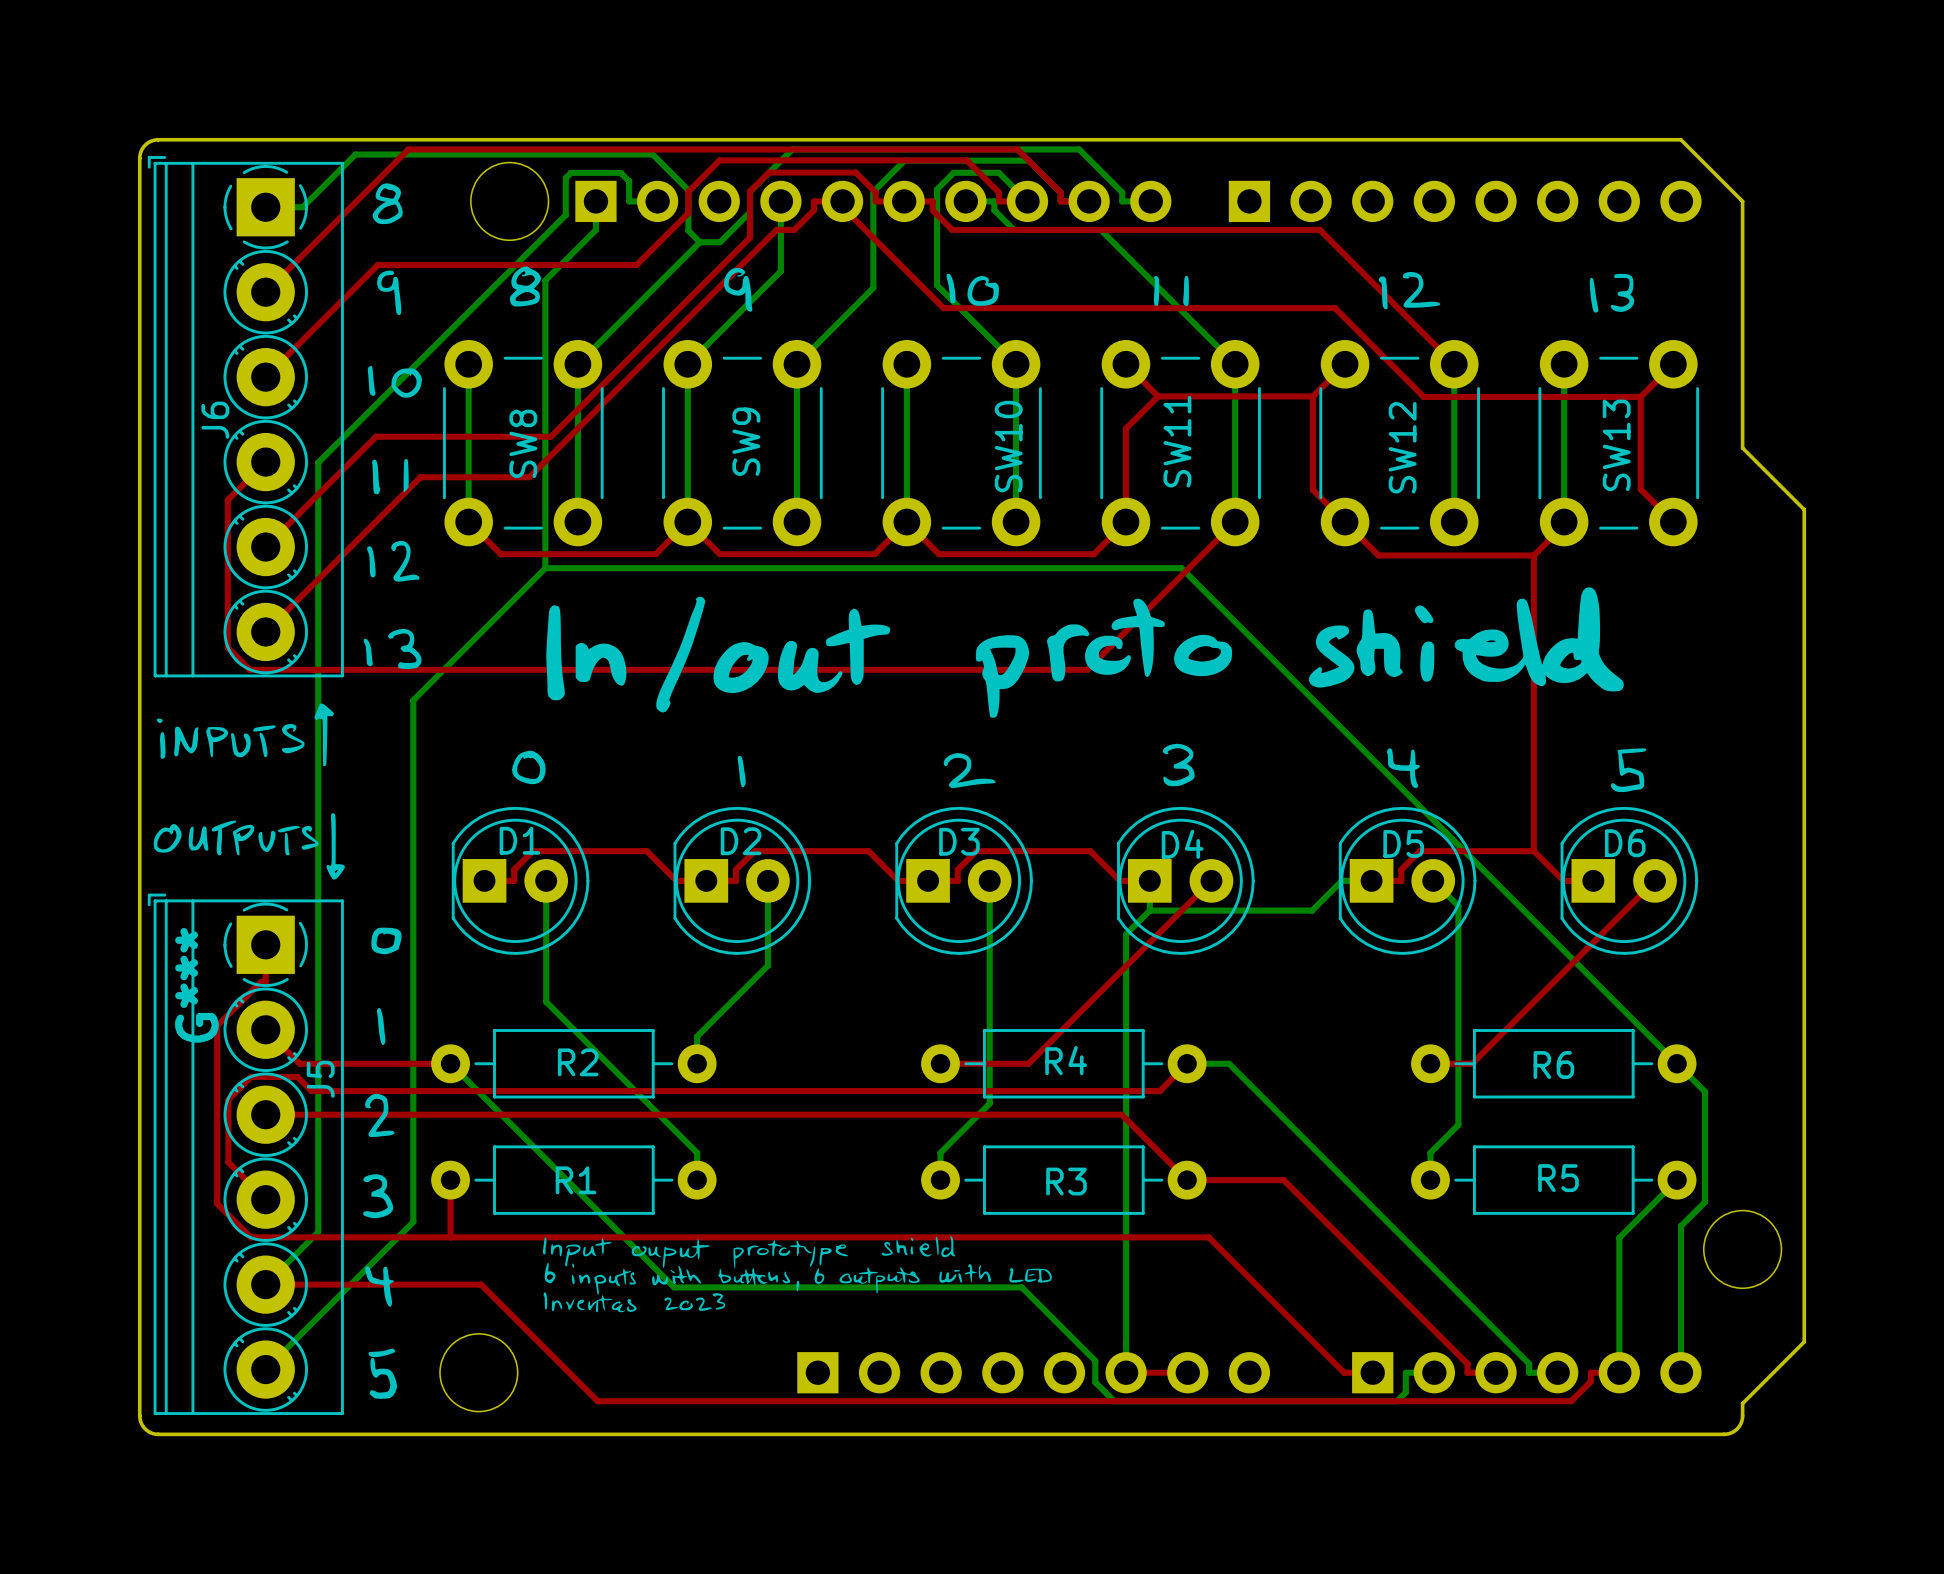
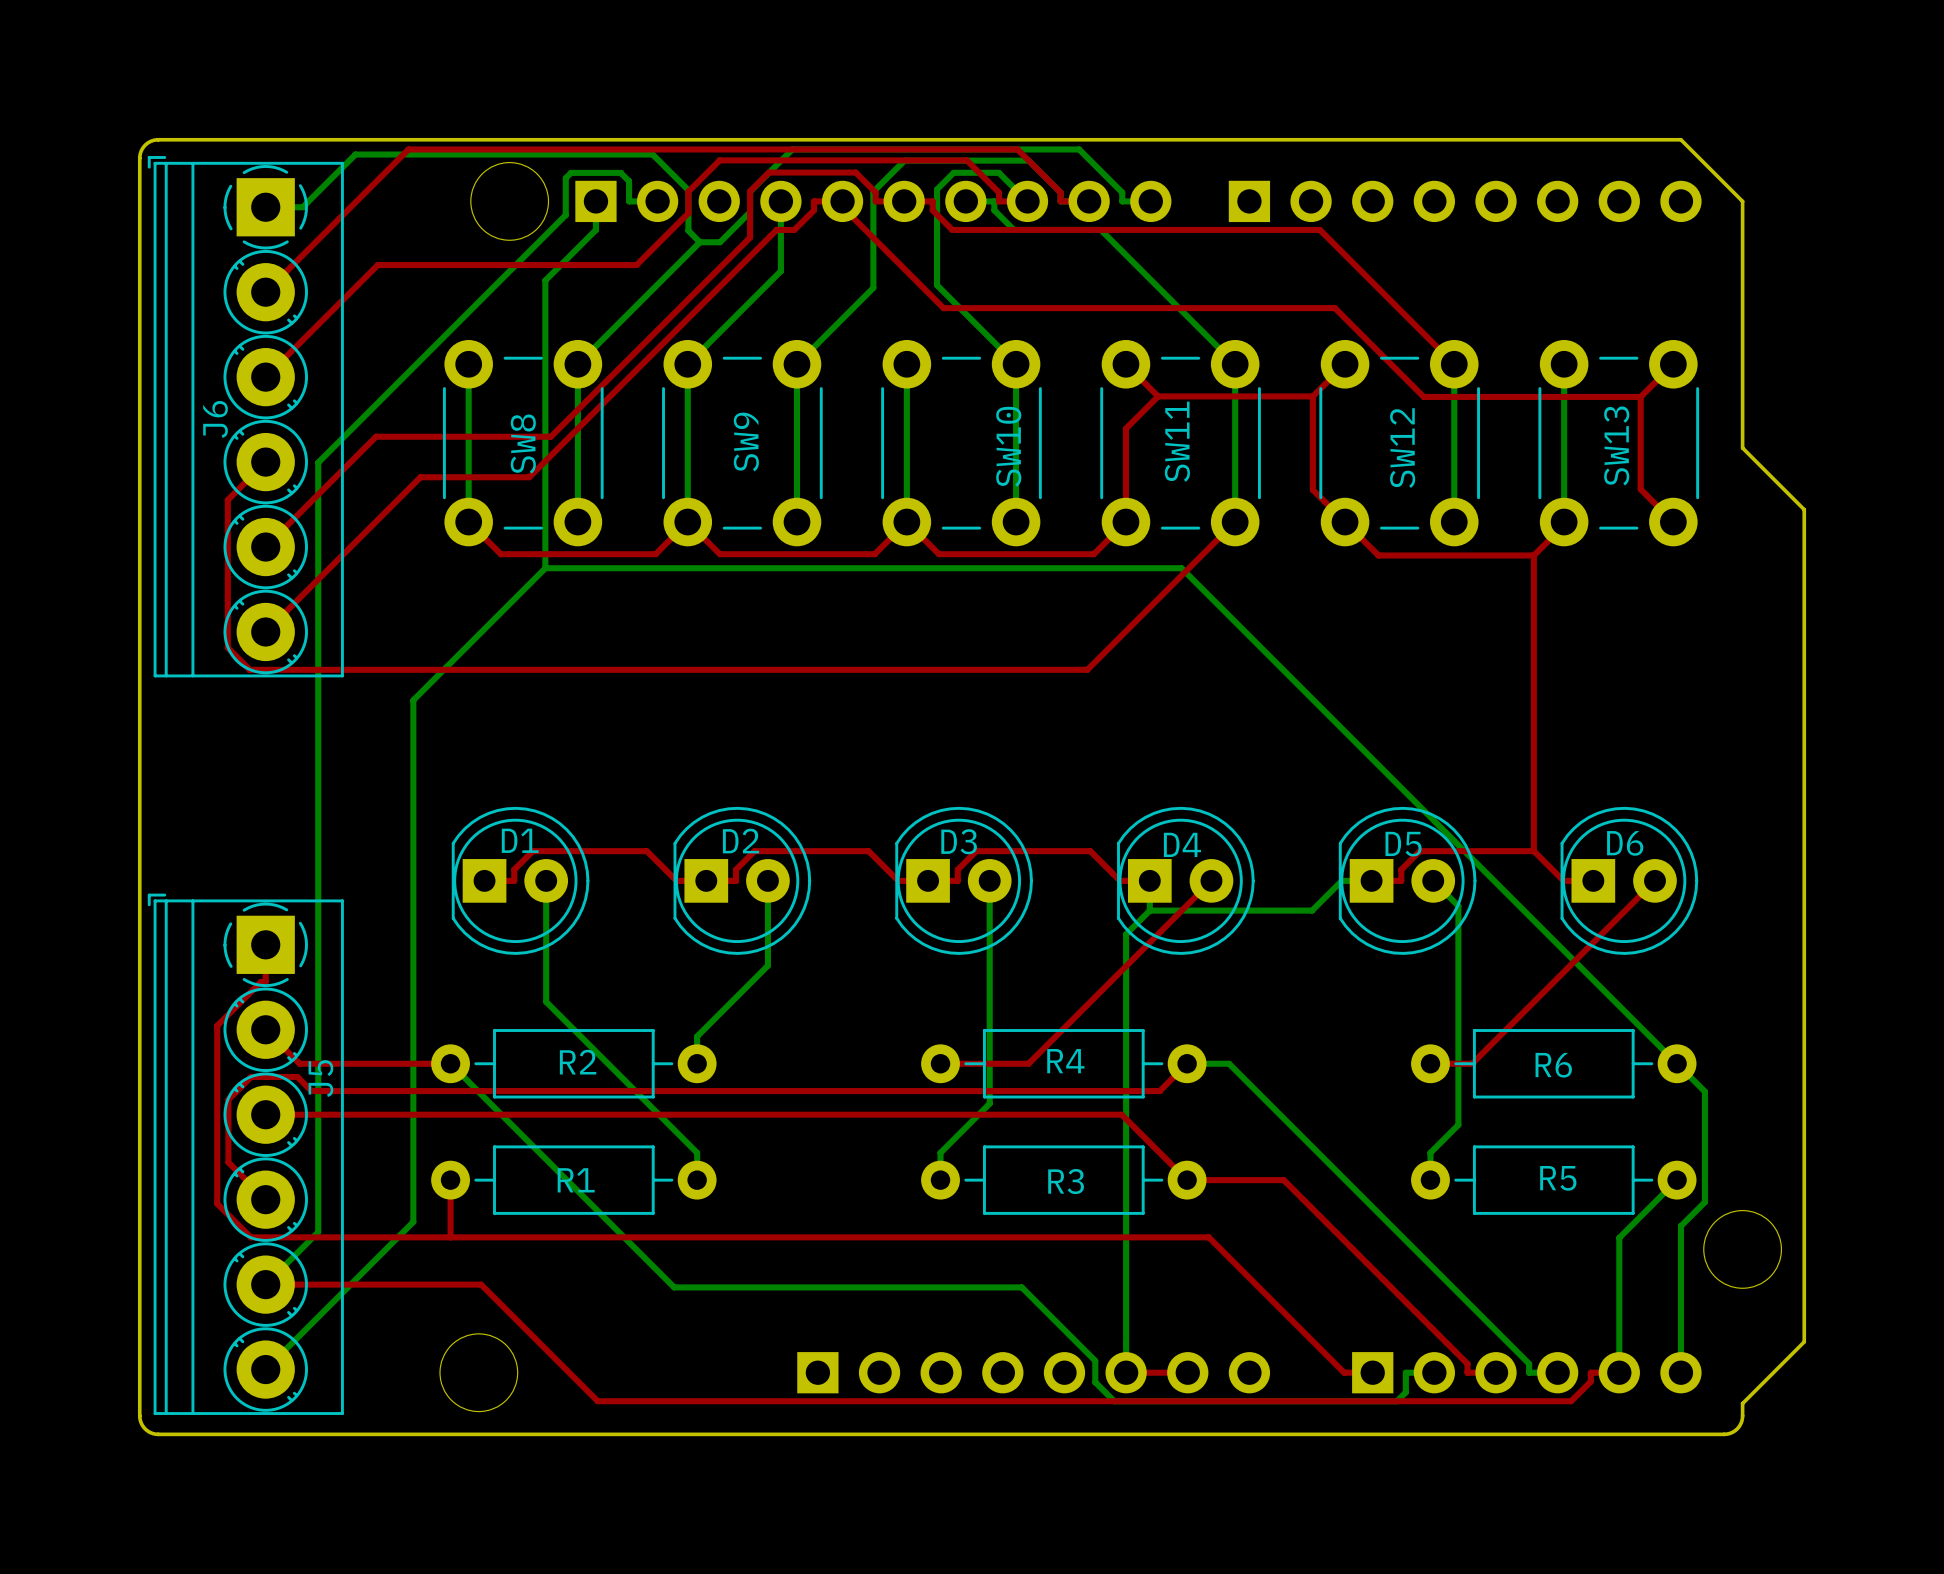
G***: (899, 791) -> none

